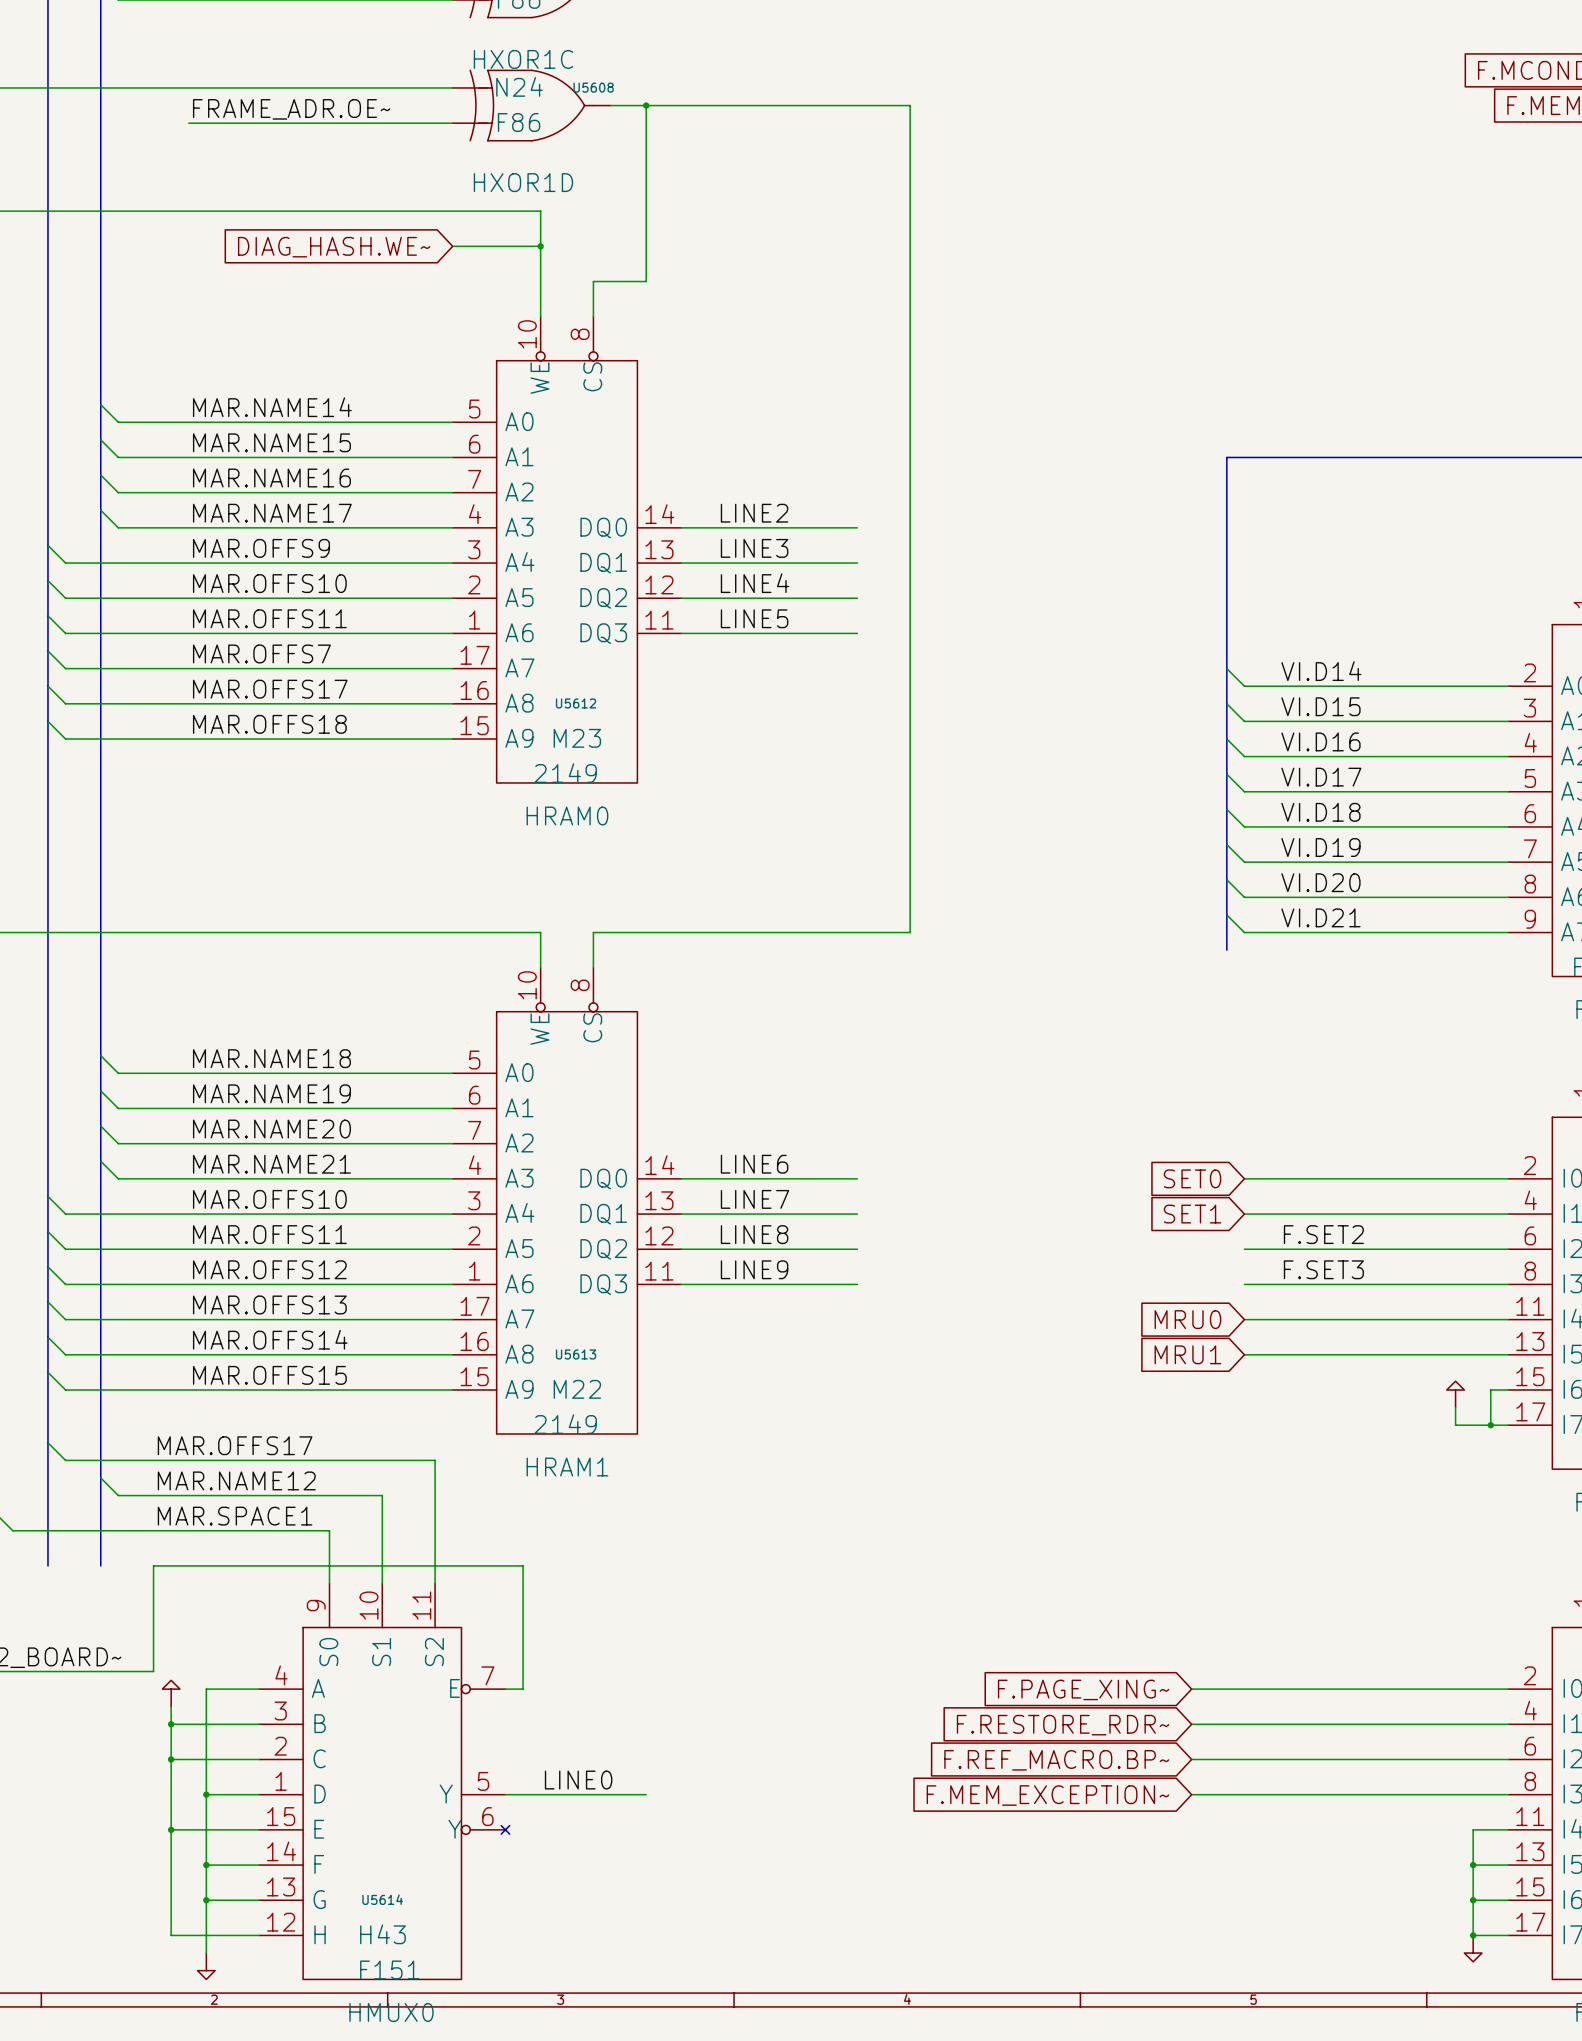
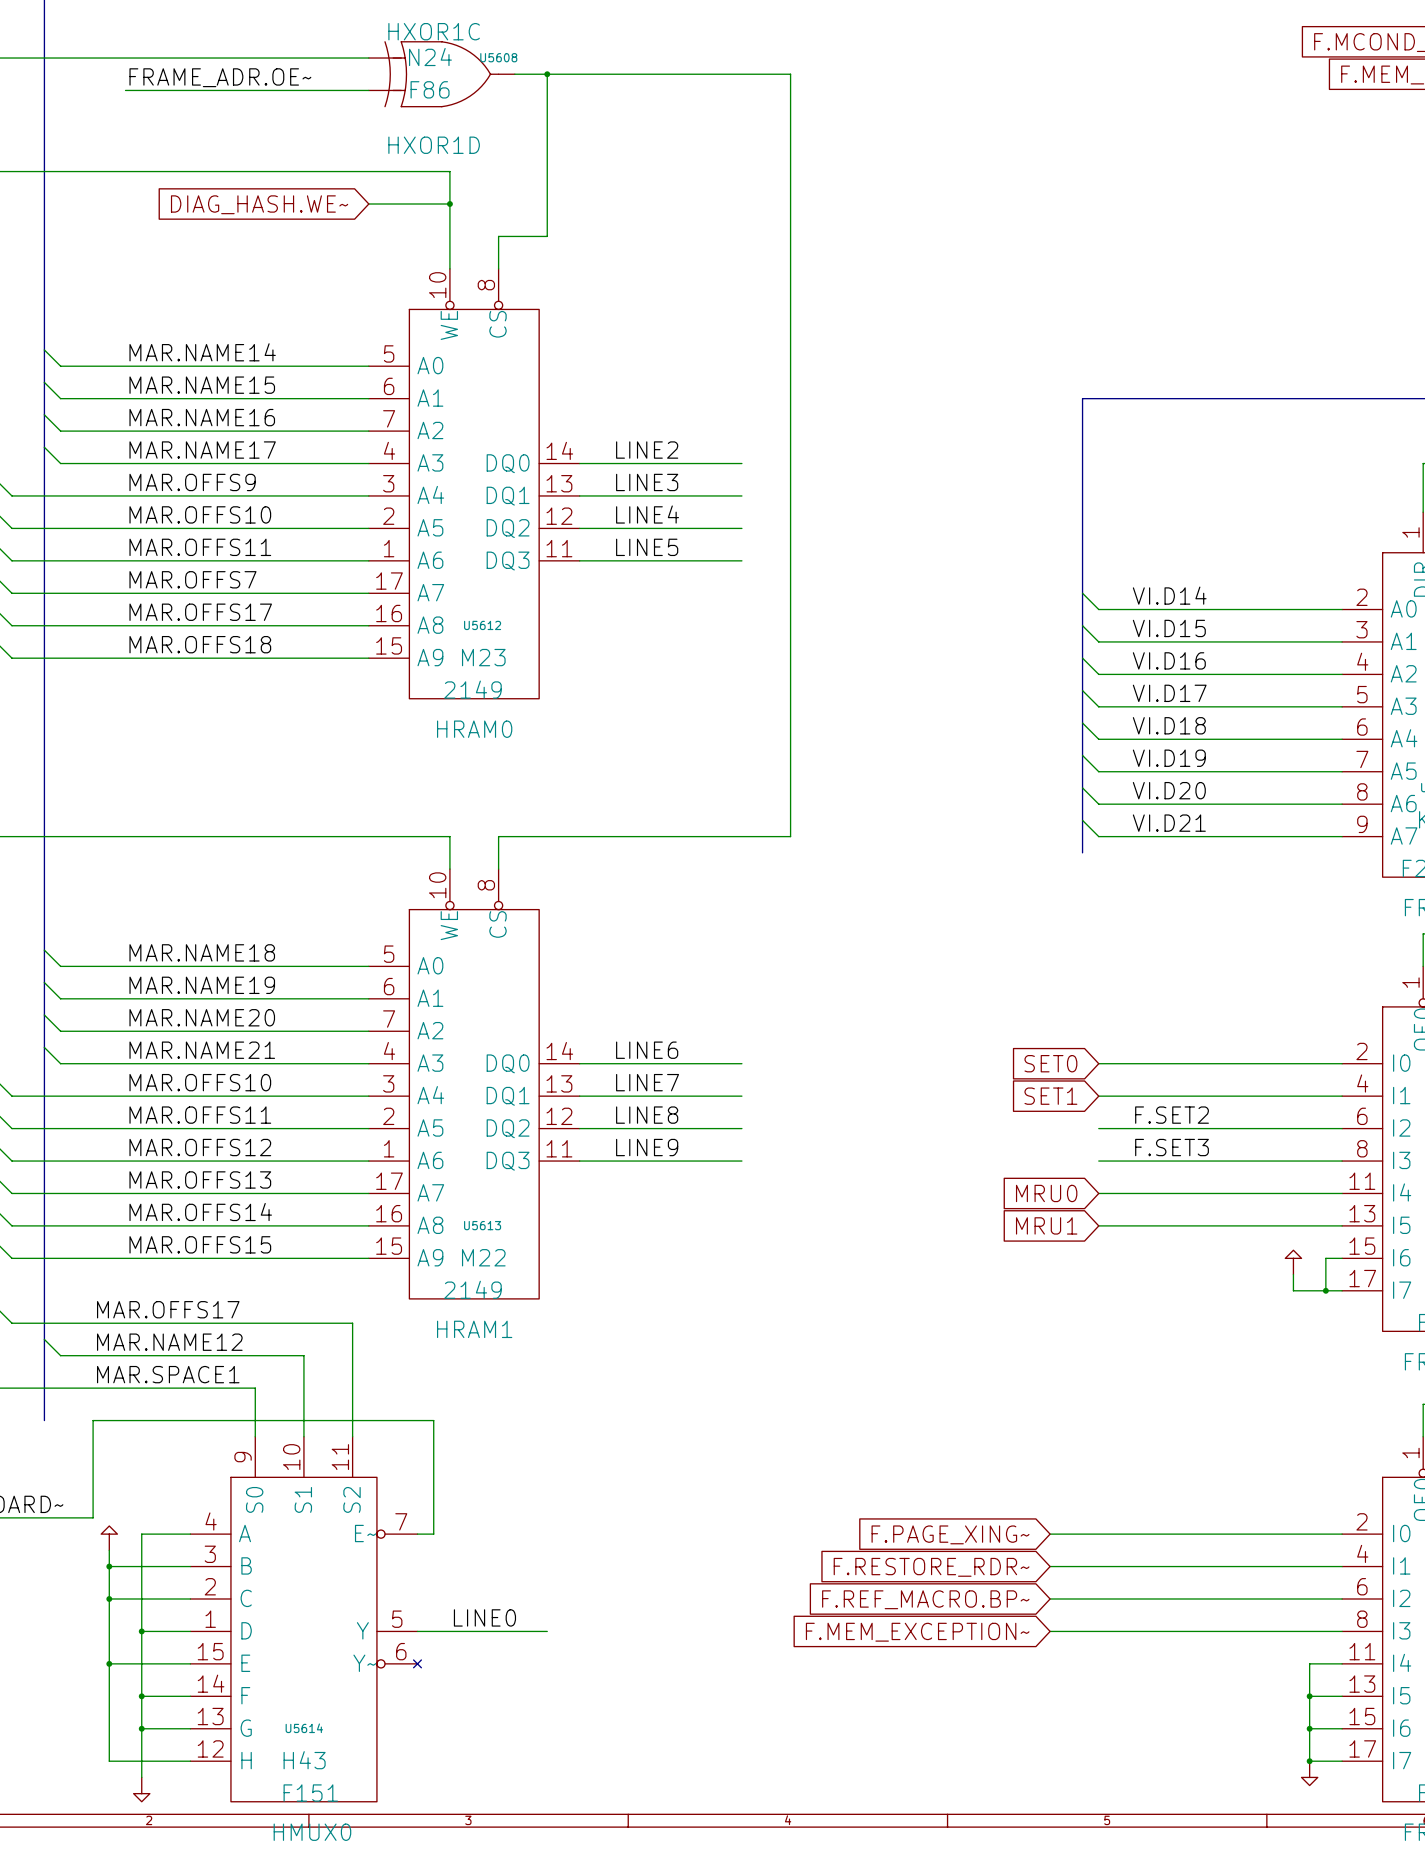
U5614 pin name: E (454, 1688) -> E~ (365, 1533)
U5614 pin name: Y (454, 1829) -> Y~ (364, 1663)

